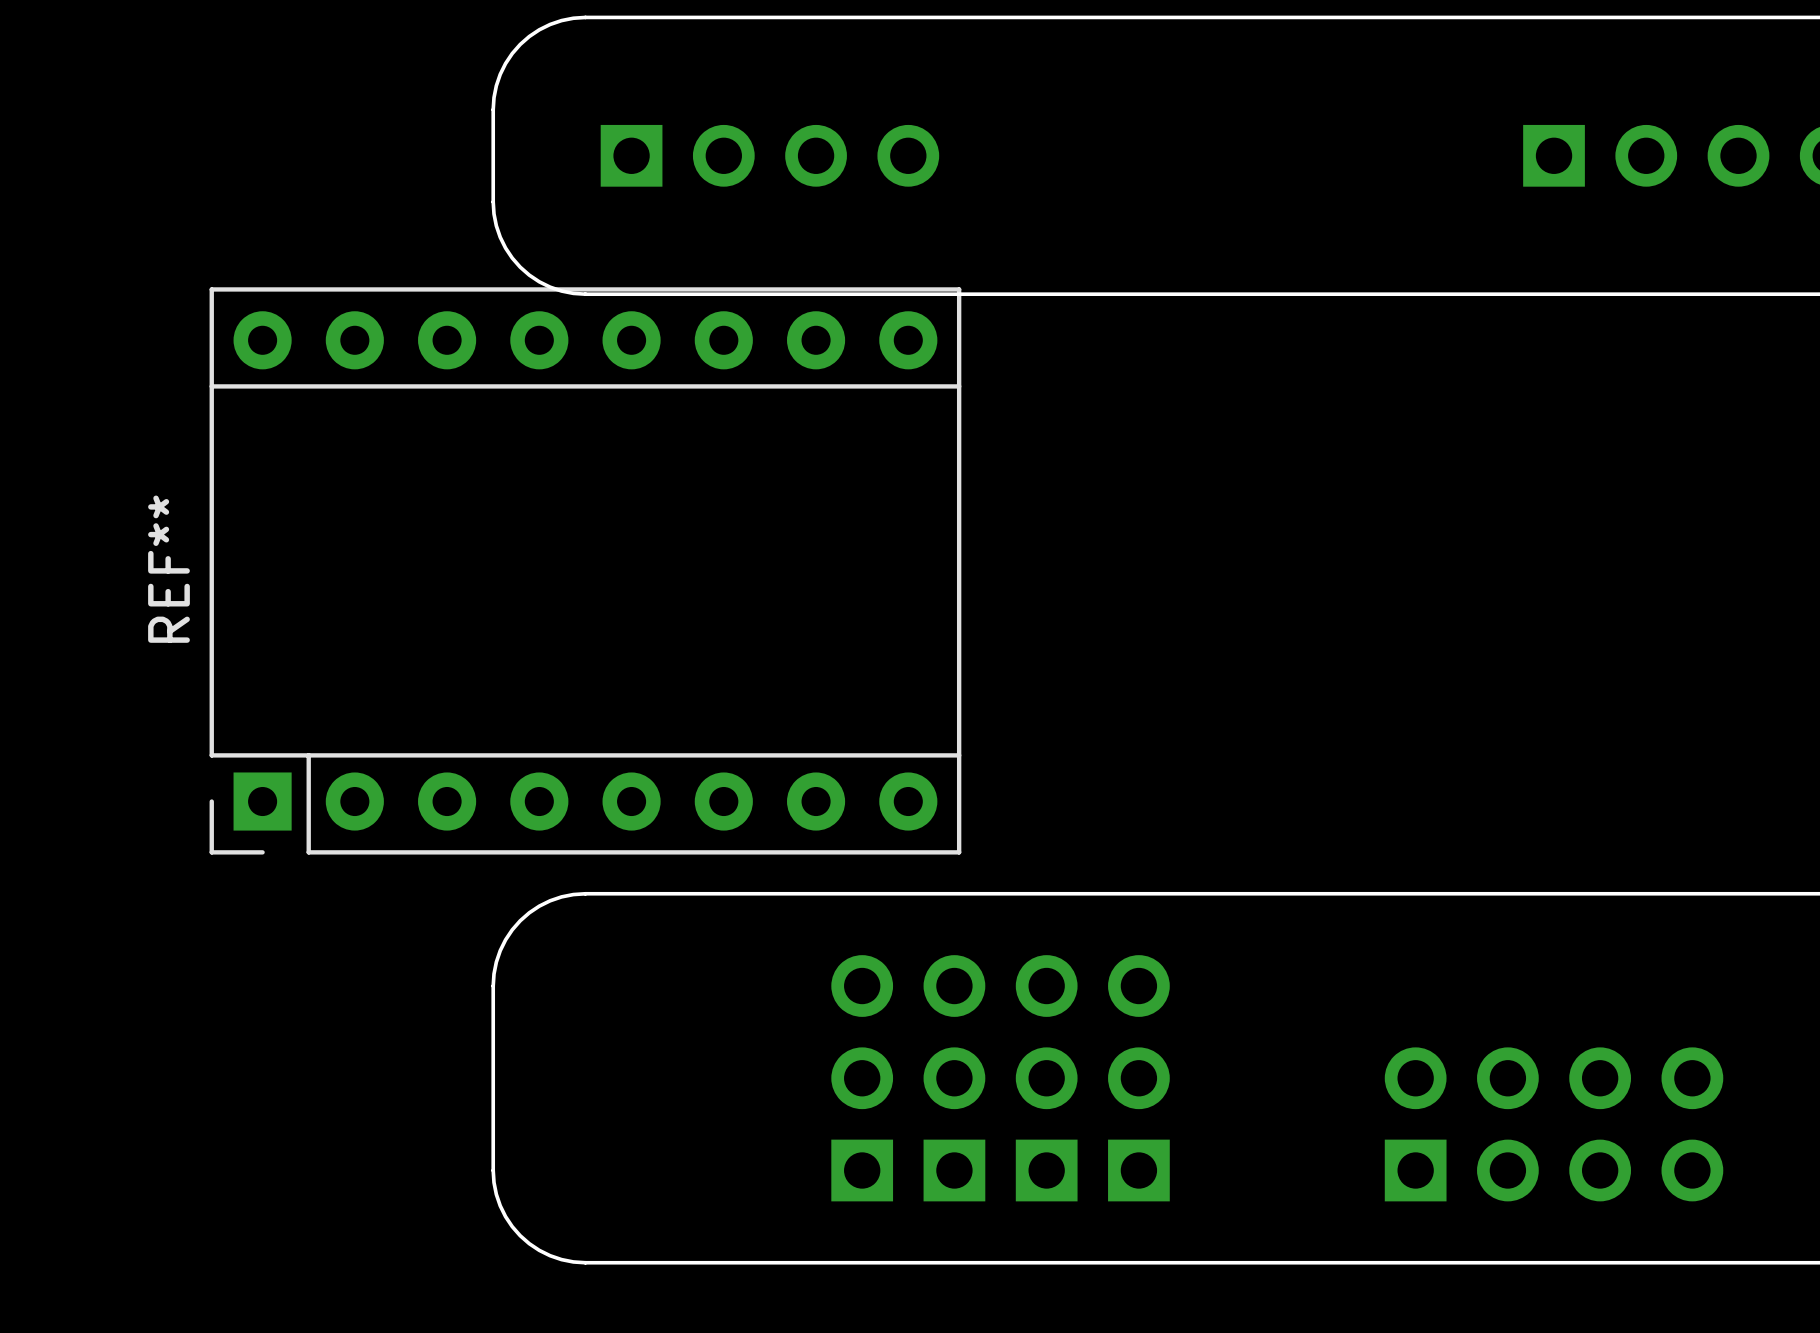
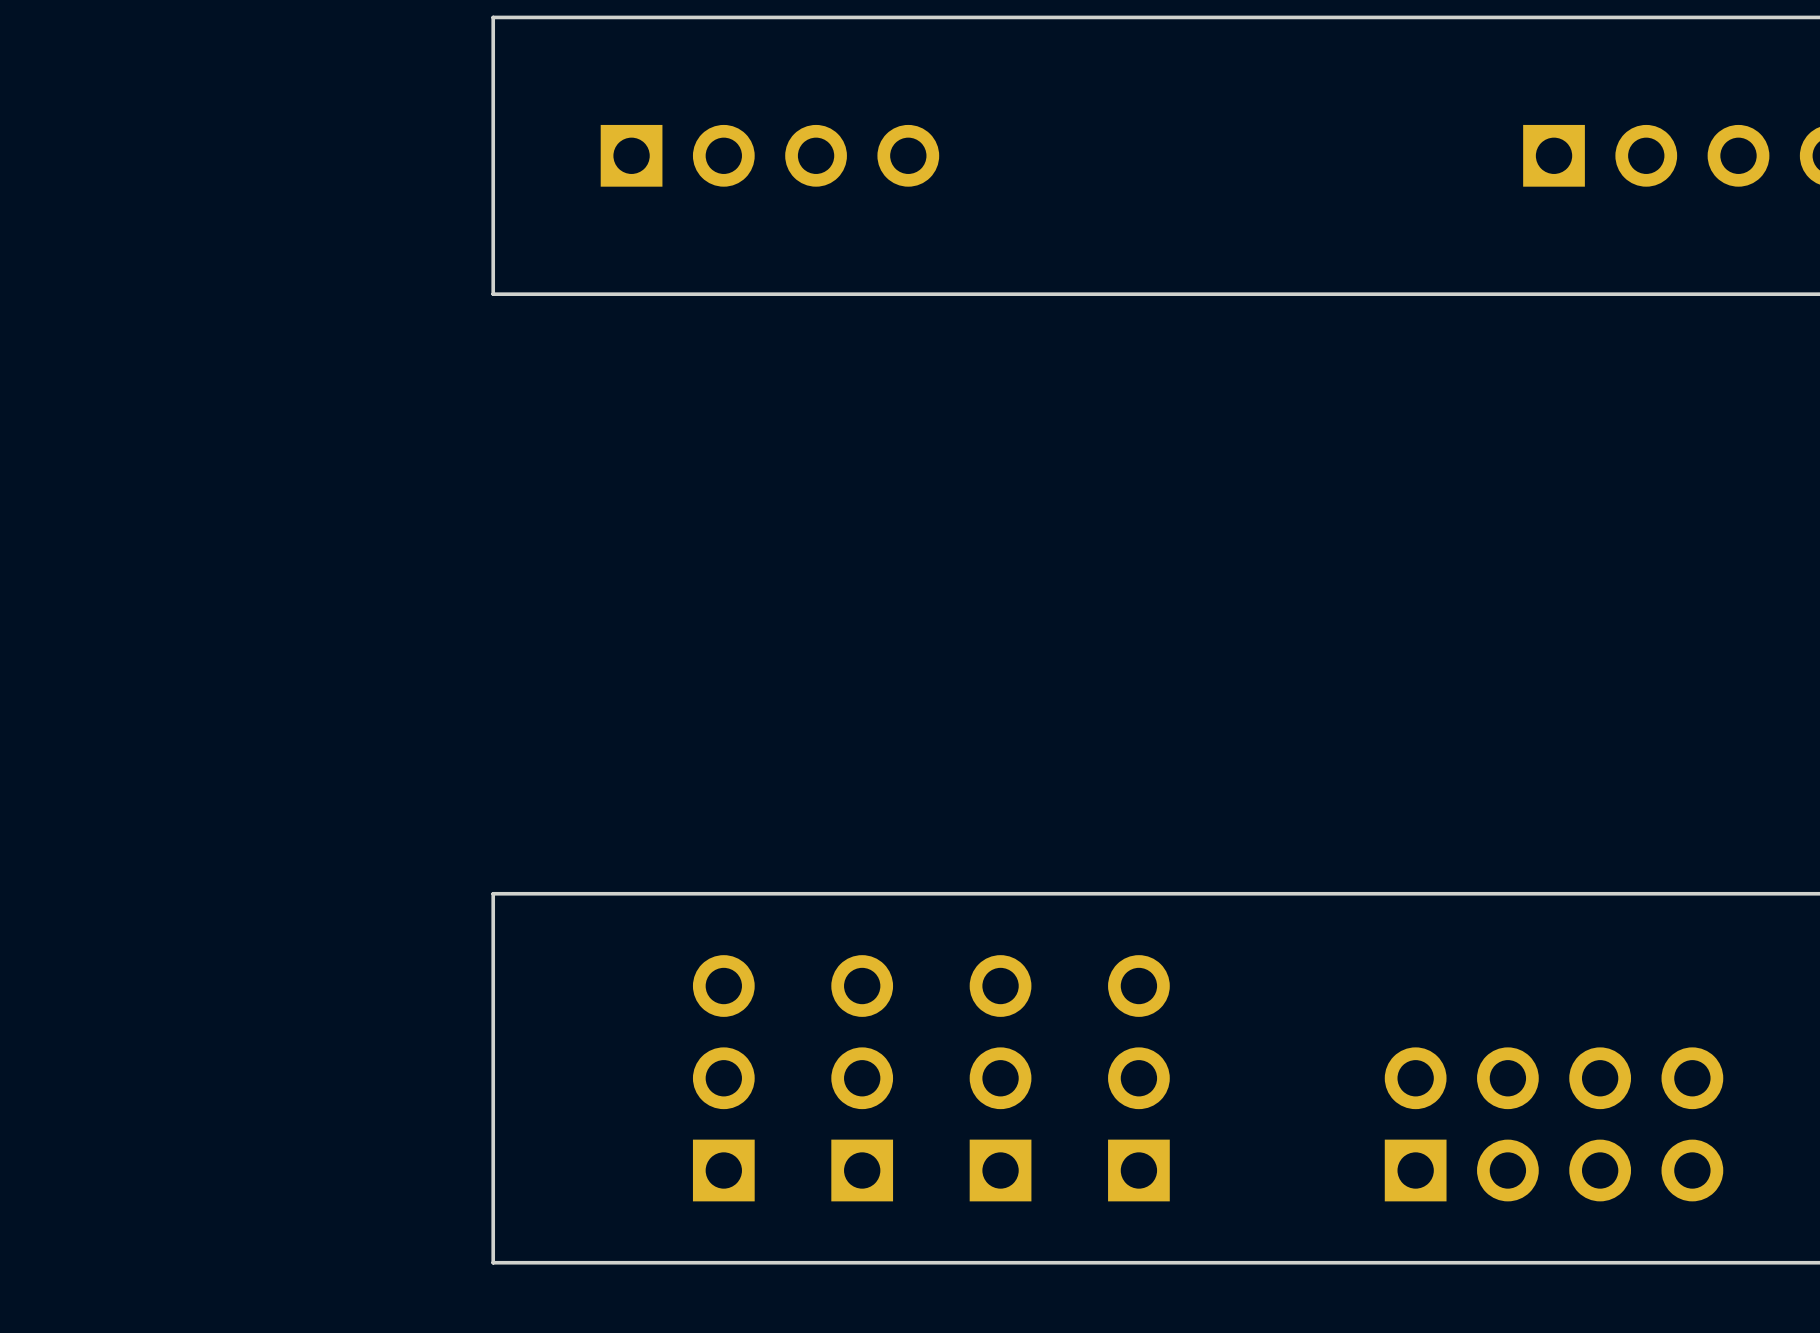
board edge: (585, 17) (561, 20) (550, 24) (539, 29) (520, 44) (512, 53) (500, 74) (496, 85) (493, 109) -> (585, 17) (493, 17) (493, 109)
board edge: (493, 201) (493, 213) (500, 237) (505, 248) (520, 267) (529, 275) (550, 287) (561, 291) (585, 294) -> (493, 201) (493, 294) (585, 294)
REF**: (585, 570) -> none
board edge: (585, 893) (561, 896) (550, 900) (529, 912) (520, 920) (505, 939) (500, 950) (493, 973) (493, 986) -> (585, 893) (493, 893) (493, 986)
part: none -> (723, 1078)
part: (954, 1078) -> none
part: none -> (1000, 1078)
part: (1046, 1078) -> none
board edge: (493, 1170) (493, 1182) (500, 1205) (505, 1216) (520, 1235) (529, 1243) (550, 1255) (561, 1259) (585, 1262) -> (493, 1170) (493, 1262) (585, 1262)

